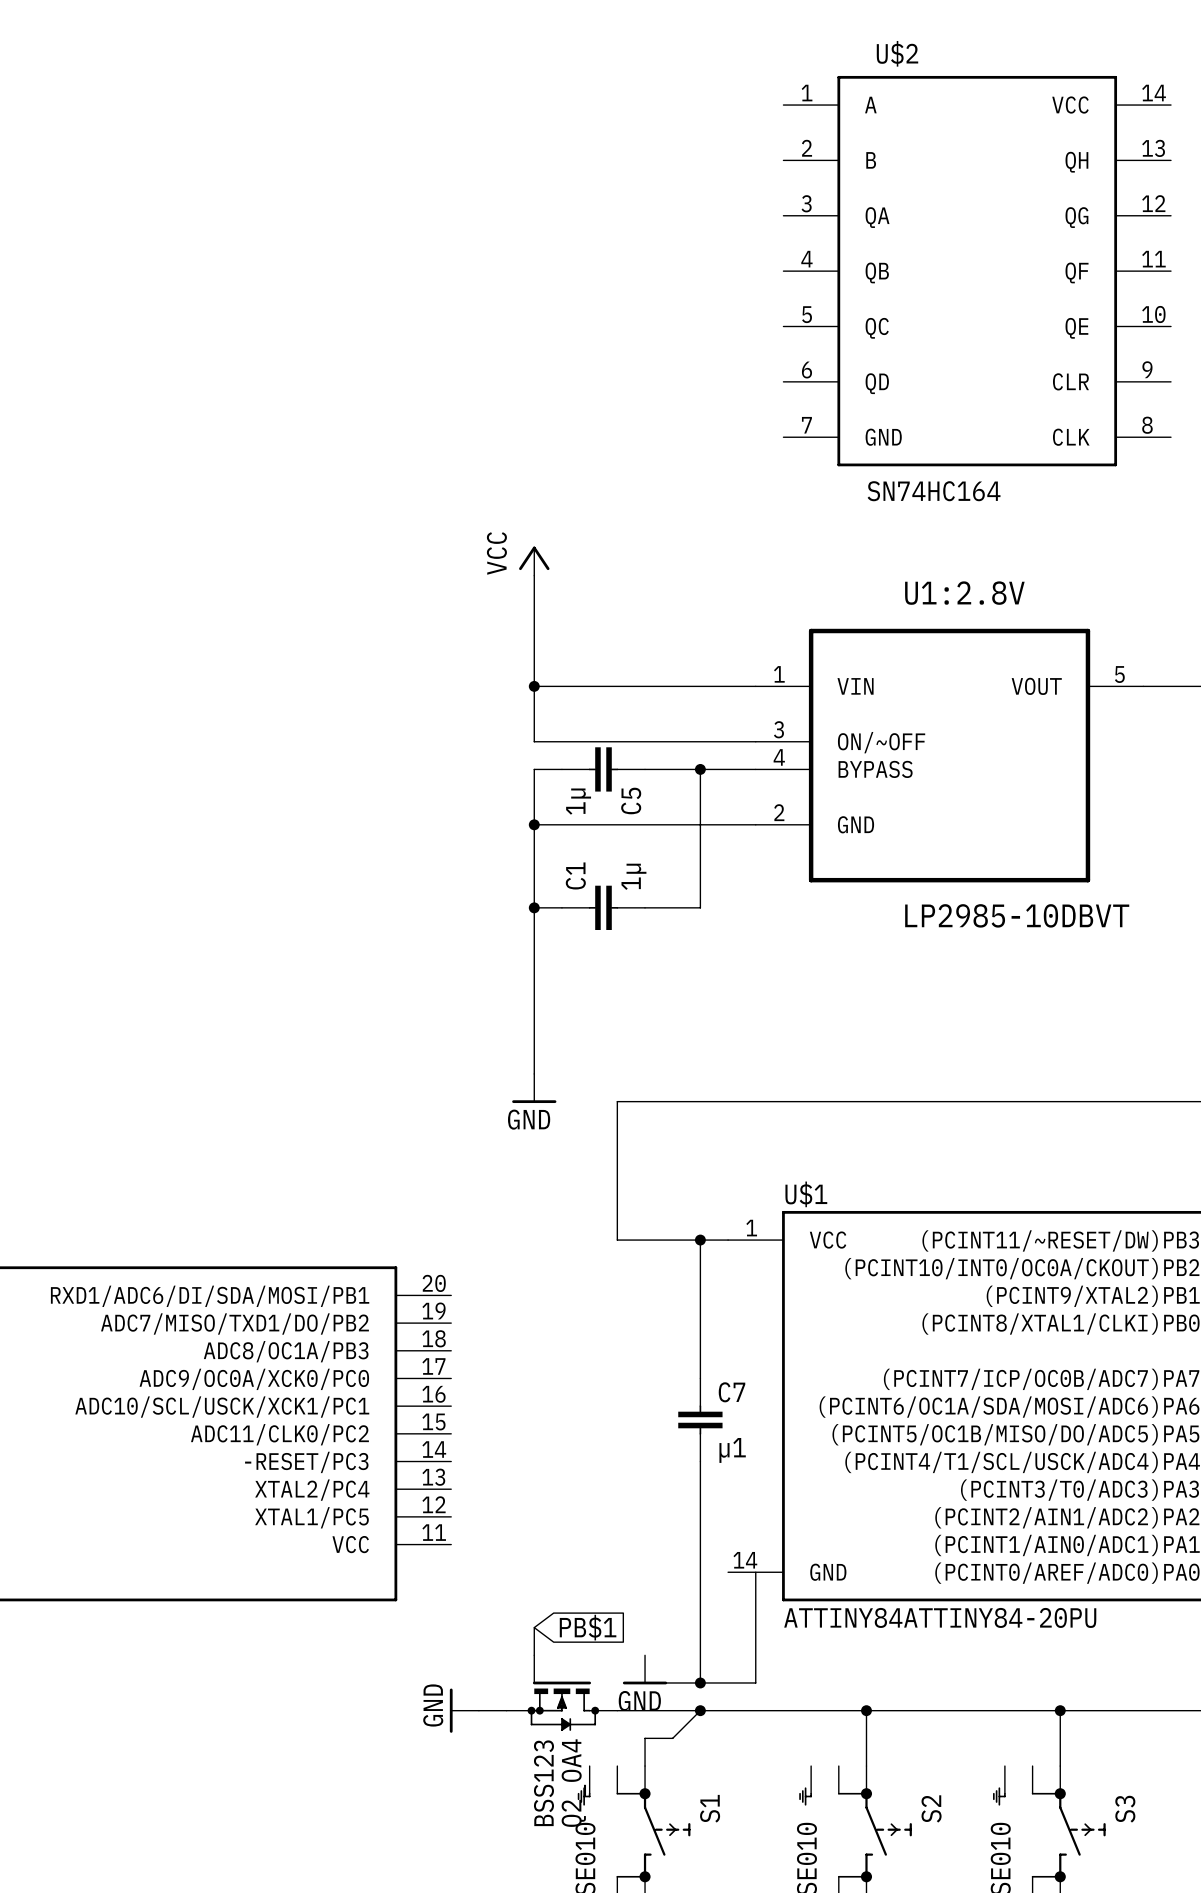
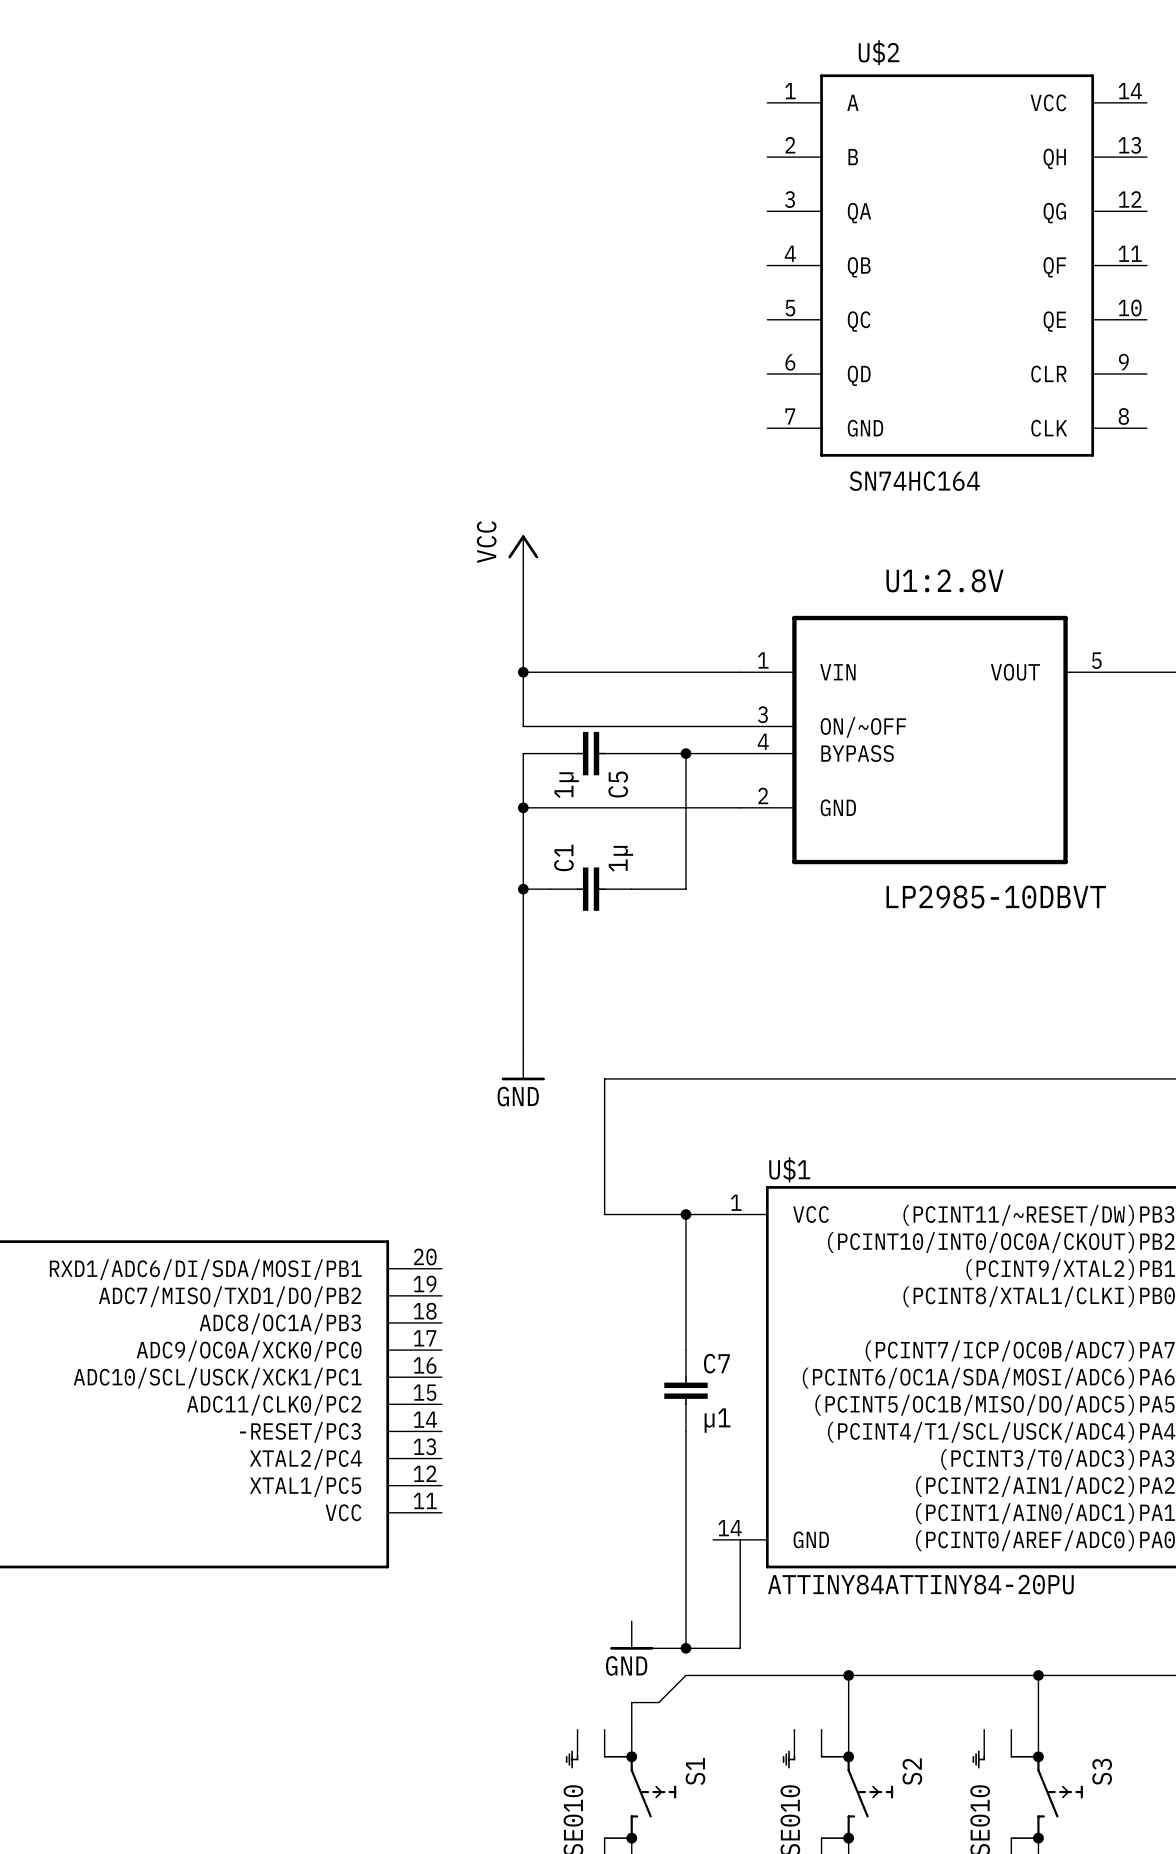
wire: (534, 1627) (534, 1655) -> none
global label: PB$1 (588, 1627) -> none
Q2_OA4: BSS123 (561, 1693) -> none
power symbol: GND (464, 1710) -> none
wire: (478, 1710) (506, 1710) -> none
wire: (617, 1710) (700, 1710) -> none
junction: (700, 1710) -> none

